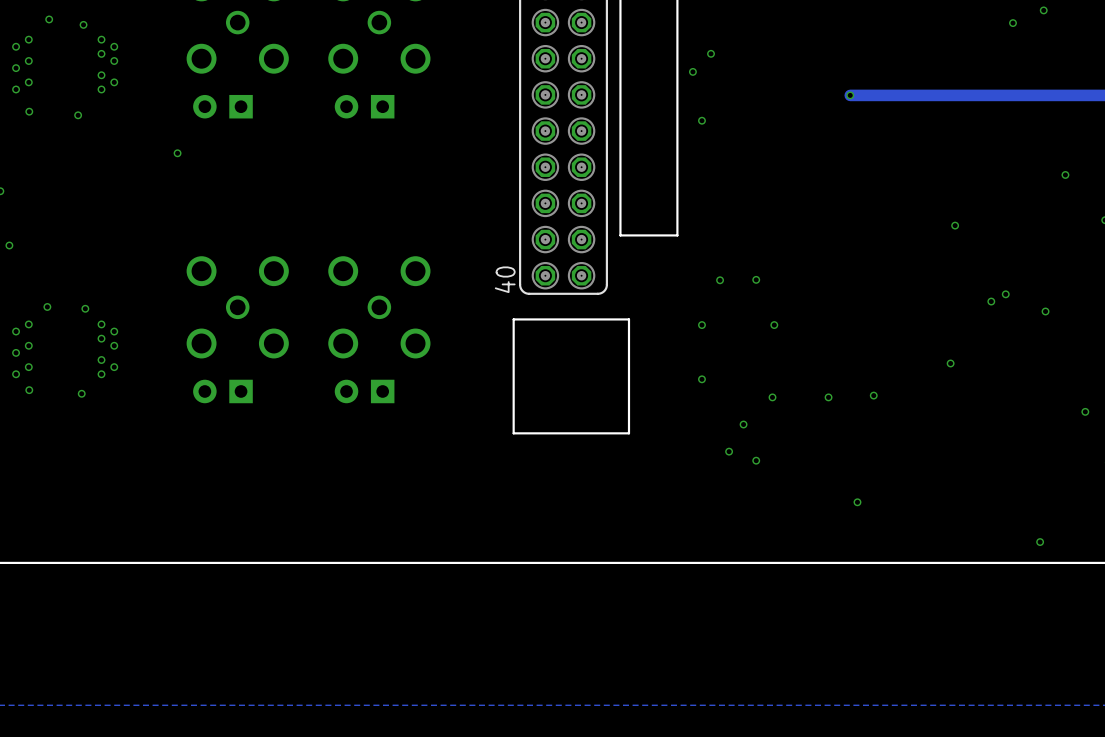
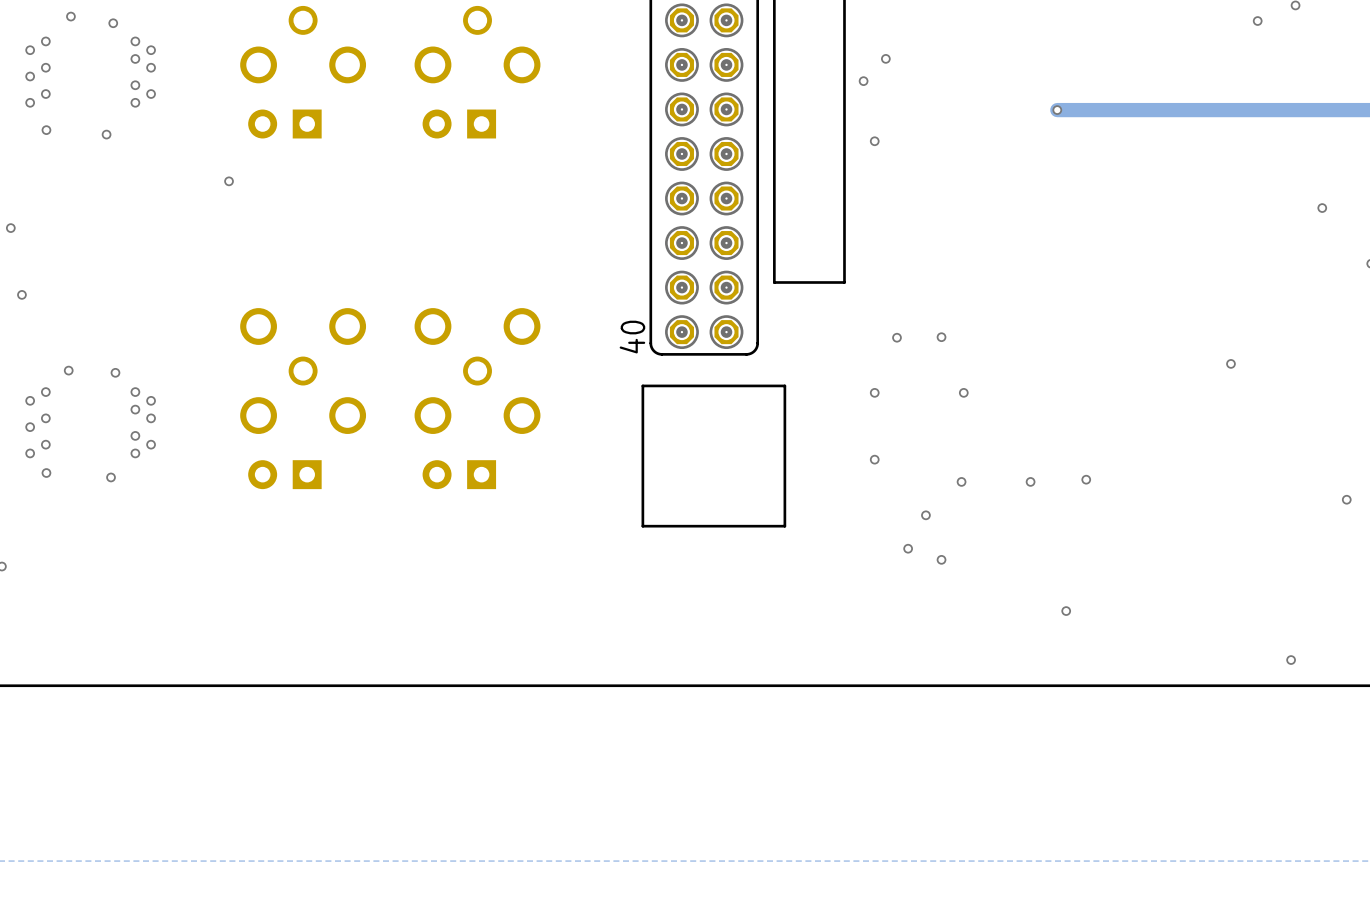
via: (955, 225) -> none
via: (1005, 294) -> none
via: (1045, 311) -> none
via: (950, 363) -> none

